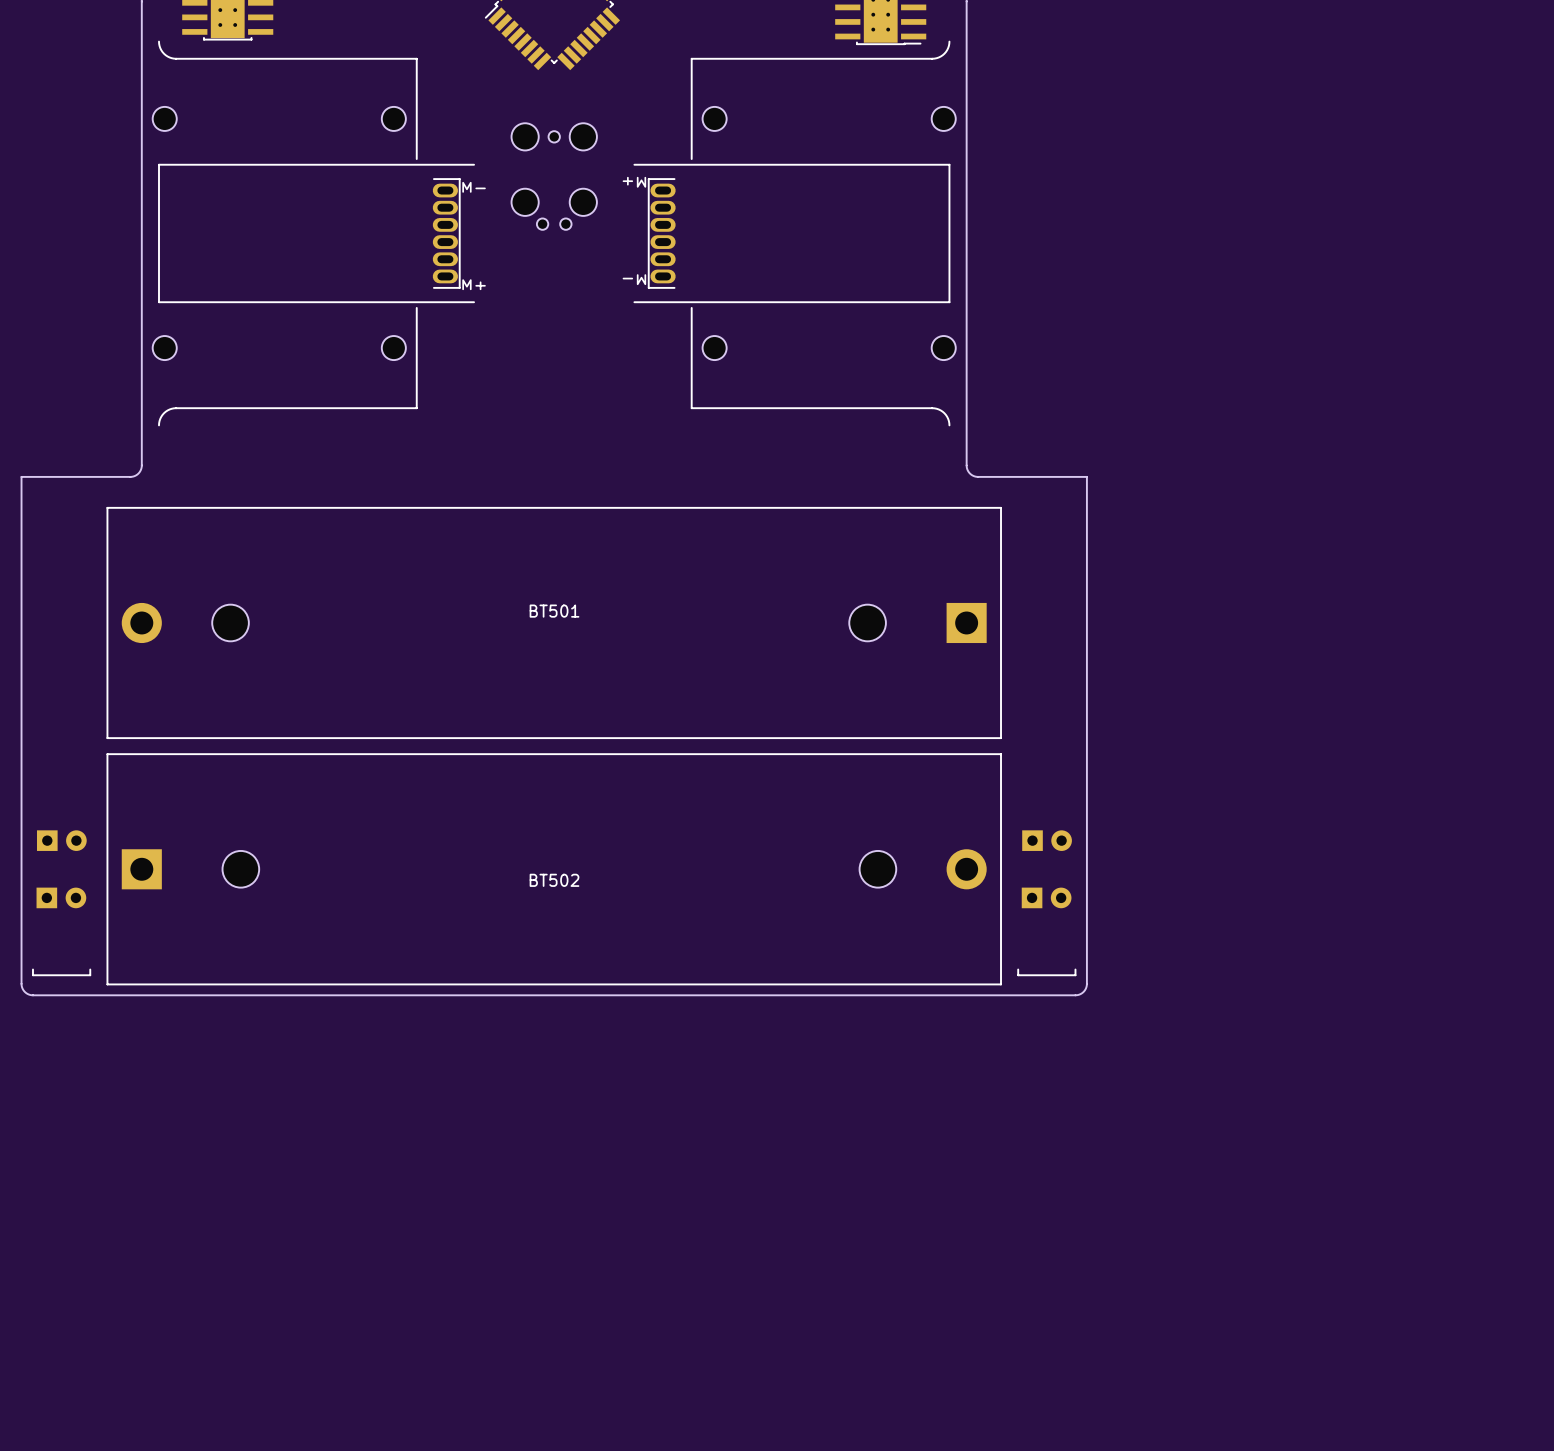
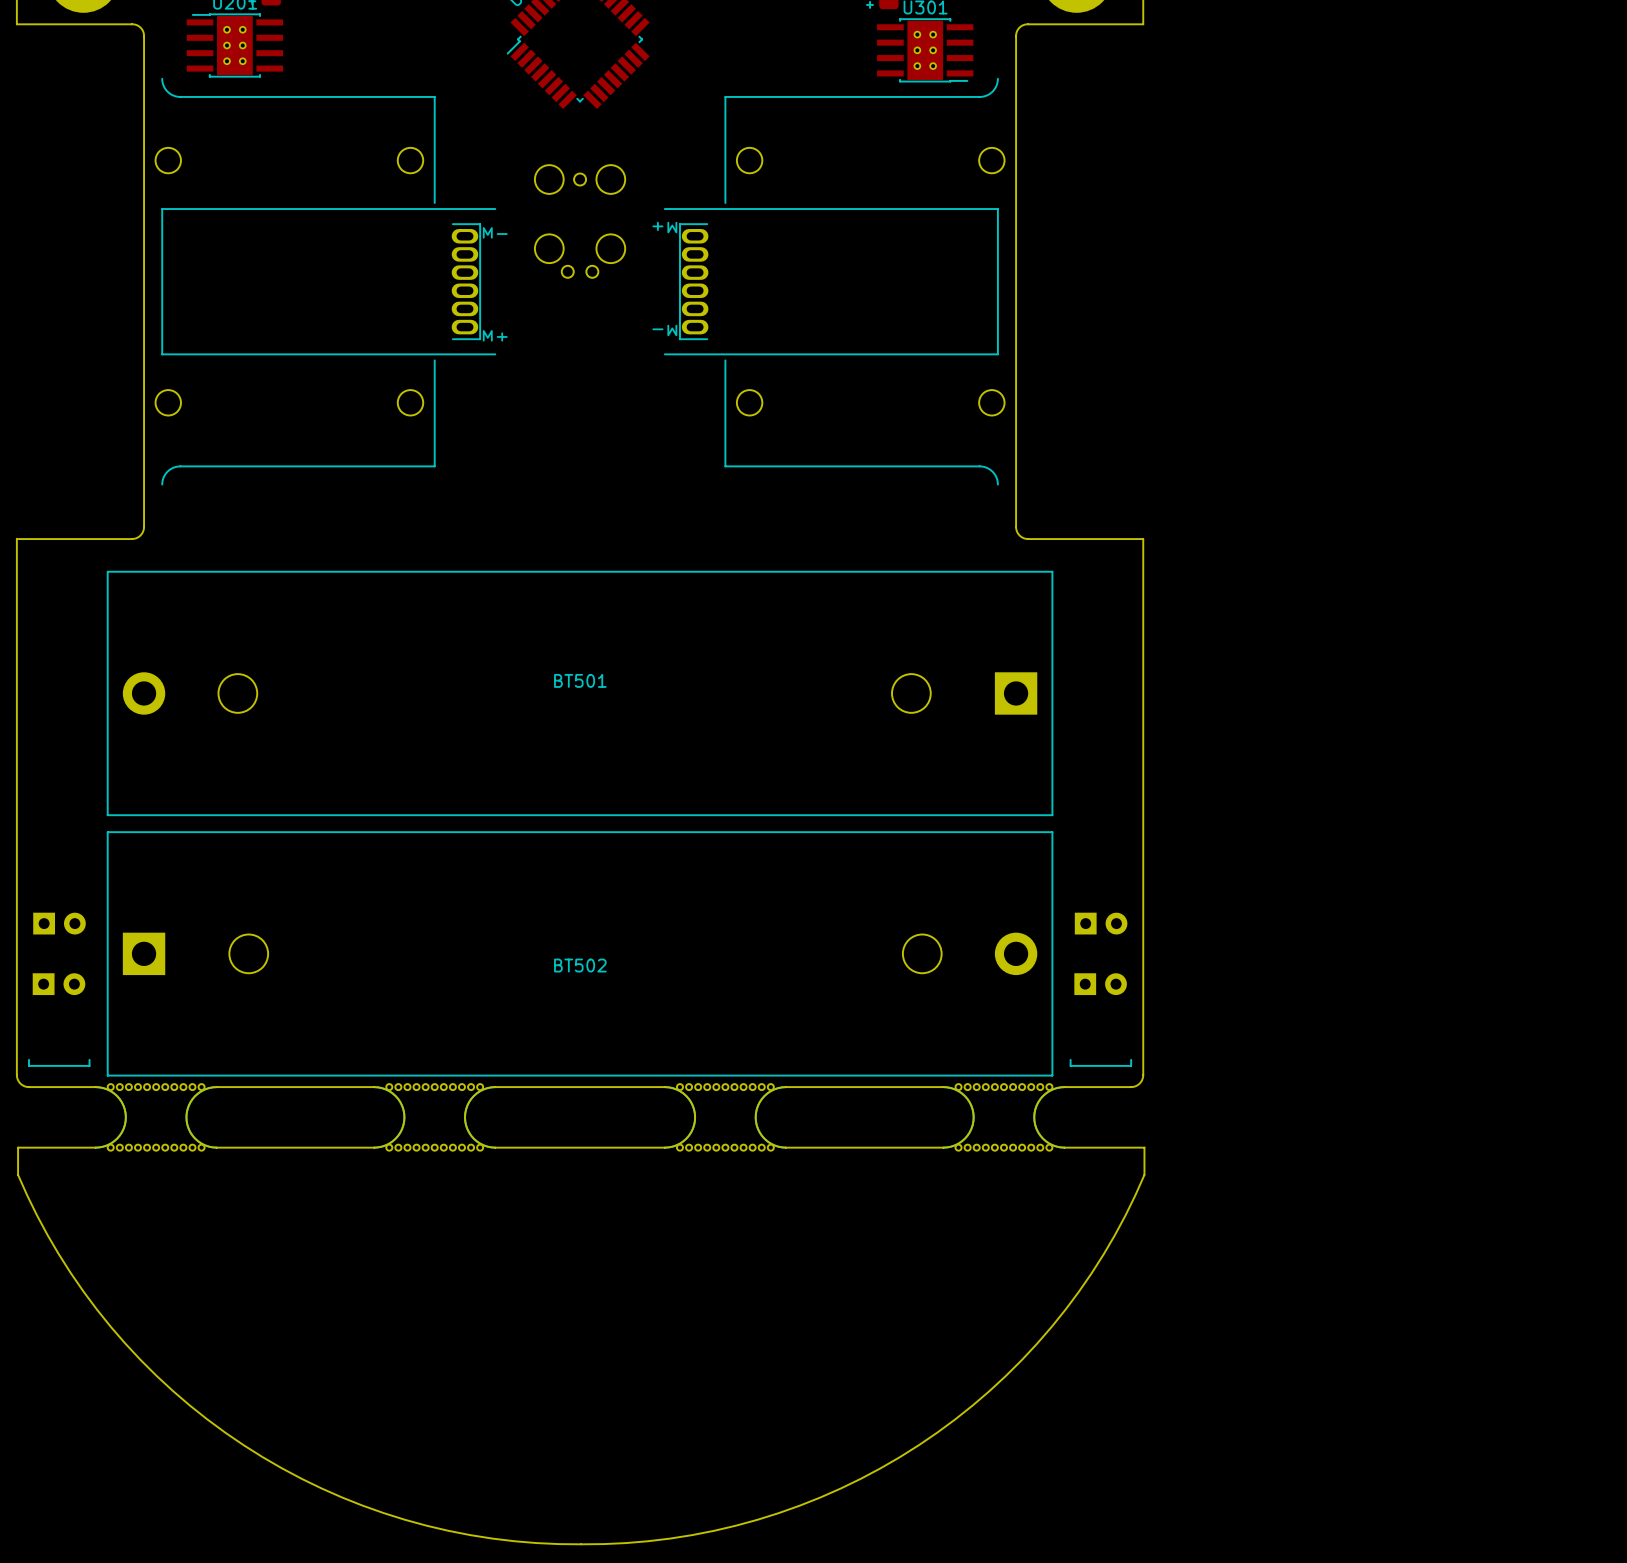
board edge: (95, 995) (210, 995) -> (374, 1087) (385, 1089) (395, 1095) (402, 1105) (404, 1117) (402, 1128) (395, 1138) (385, 1145) (374, 1147) (216, 1147) (205, 1145) (195, 1138) (190, 1132) (186, 1121) (186, 1113) (190, 1102) (195, 1095) (205, 1089) (216, 1087)
board edge: (359, 995) (474, 995) -> (664, 1087) (676, 1089) (686, 1095) (692, 1105) (695, 1117) (692, 1128) (686, 1138) (676, 1145) (664, 1147) (495, 1147) (483, 1145) (473, 1138) (469, 1132) (465, 1121) (465, 1113) (469, 1102) (473, 1095) (483, 1089) (495, 1087)
board edge: (634, 995) (748, 995) -> (943, 1087) (954, 1089) (964, 1095) (971, 1105) (973, 1117) (971, 1128) (964, 1138) (954, 1145) (943, 1147) (785, 1147) (774, 1145) (764, 1138) (759, 1132) (755, 1121) (755, 1113) (759, 1102) (764, 1095) (774, 1089) (785, 1087)
board edge: (897, 995) (1012, 995) -> (95, 1087) (110, 1091) (117, 1095) (123, 1105) (125, 1121) (121, 1132) (117, 1138) (110, 1143) (99, 1147) (18, 1147) (18, 1174) (47, 1235) (83, 1291) (110, 1326) (156, 1375) (189, 1405) (243, 1445) (301, 1478) (341, 1497) (405, 1519) (470, 1535) (514, 1541) (581, 1544) (648, 1541) (692, 1535) (757, 1519) (820, 1497) (861, 1478) (918, 1445) (955, 1419) (1006, 1375) (1037, 1343) (1079, 1291) (1115, 1235) (1144, 1174) (1144, 1147) (1060, 1147) (1049, 1143) (1043, 1138) (1038, 1132) (1034, 1121) (1036, 1105) (1043, 1095) (1049, 1091) (1064, 1087)
part: none -> (156, 1117)
part: none -> (434, 1117)
part: none -> (725, 1117)
part: none -> (1003, 1117)

